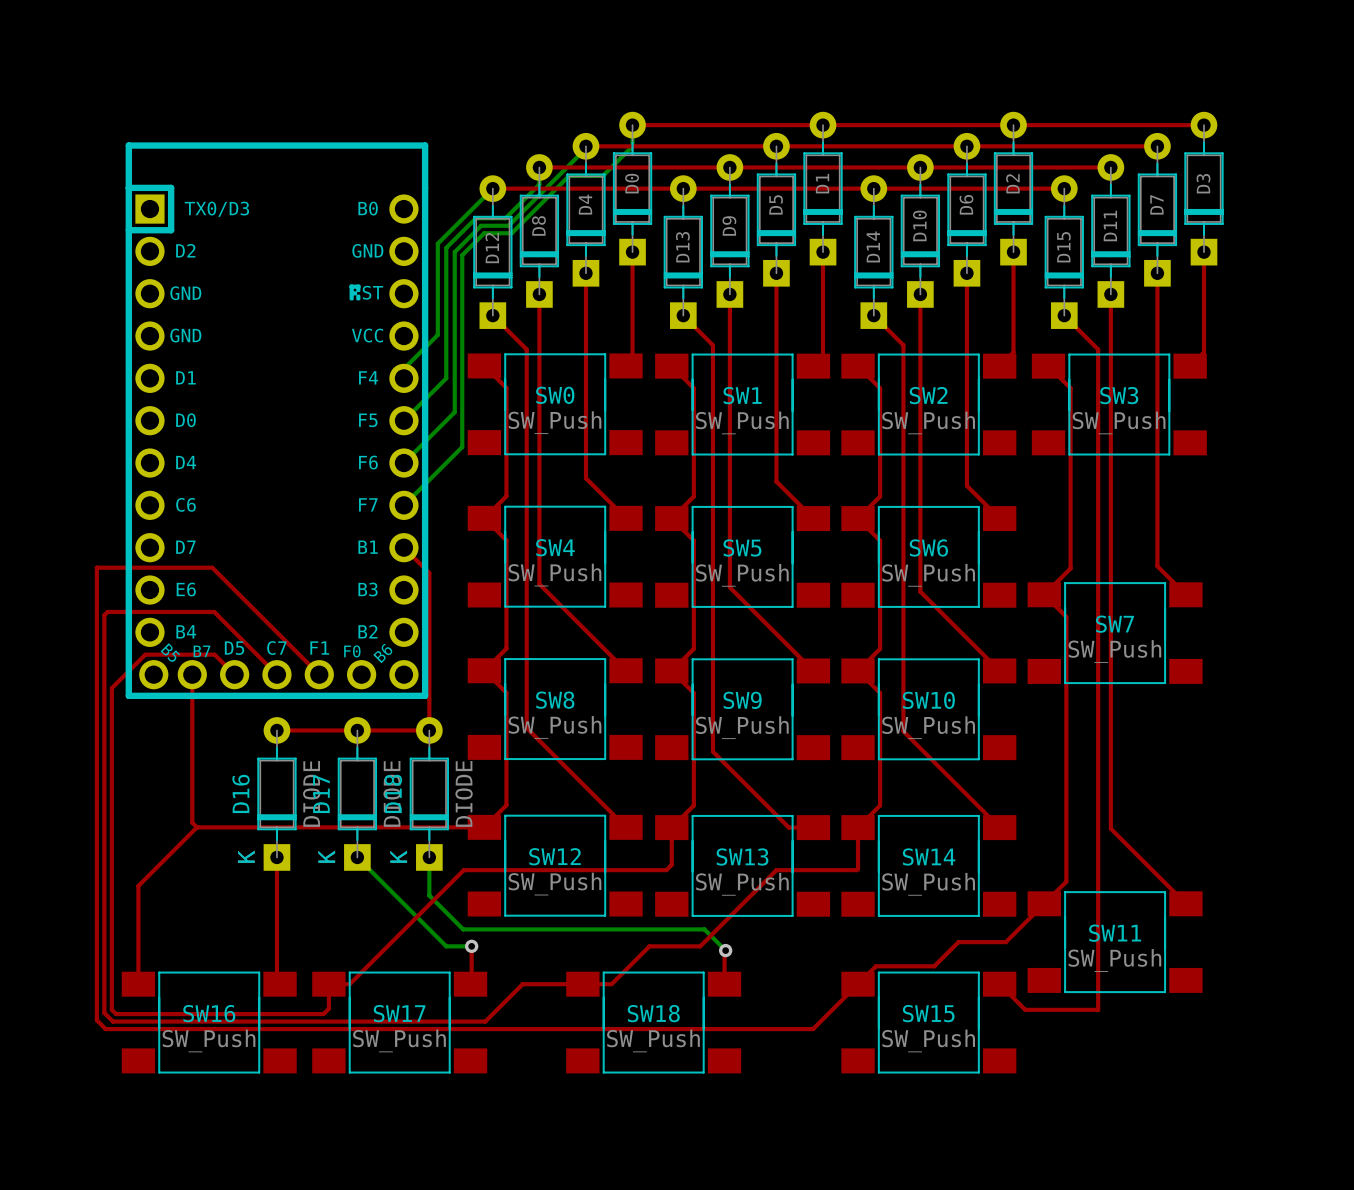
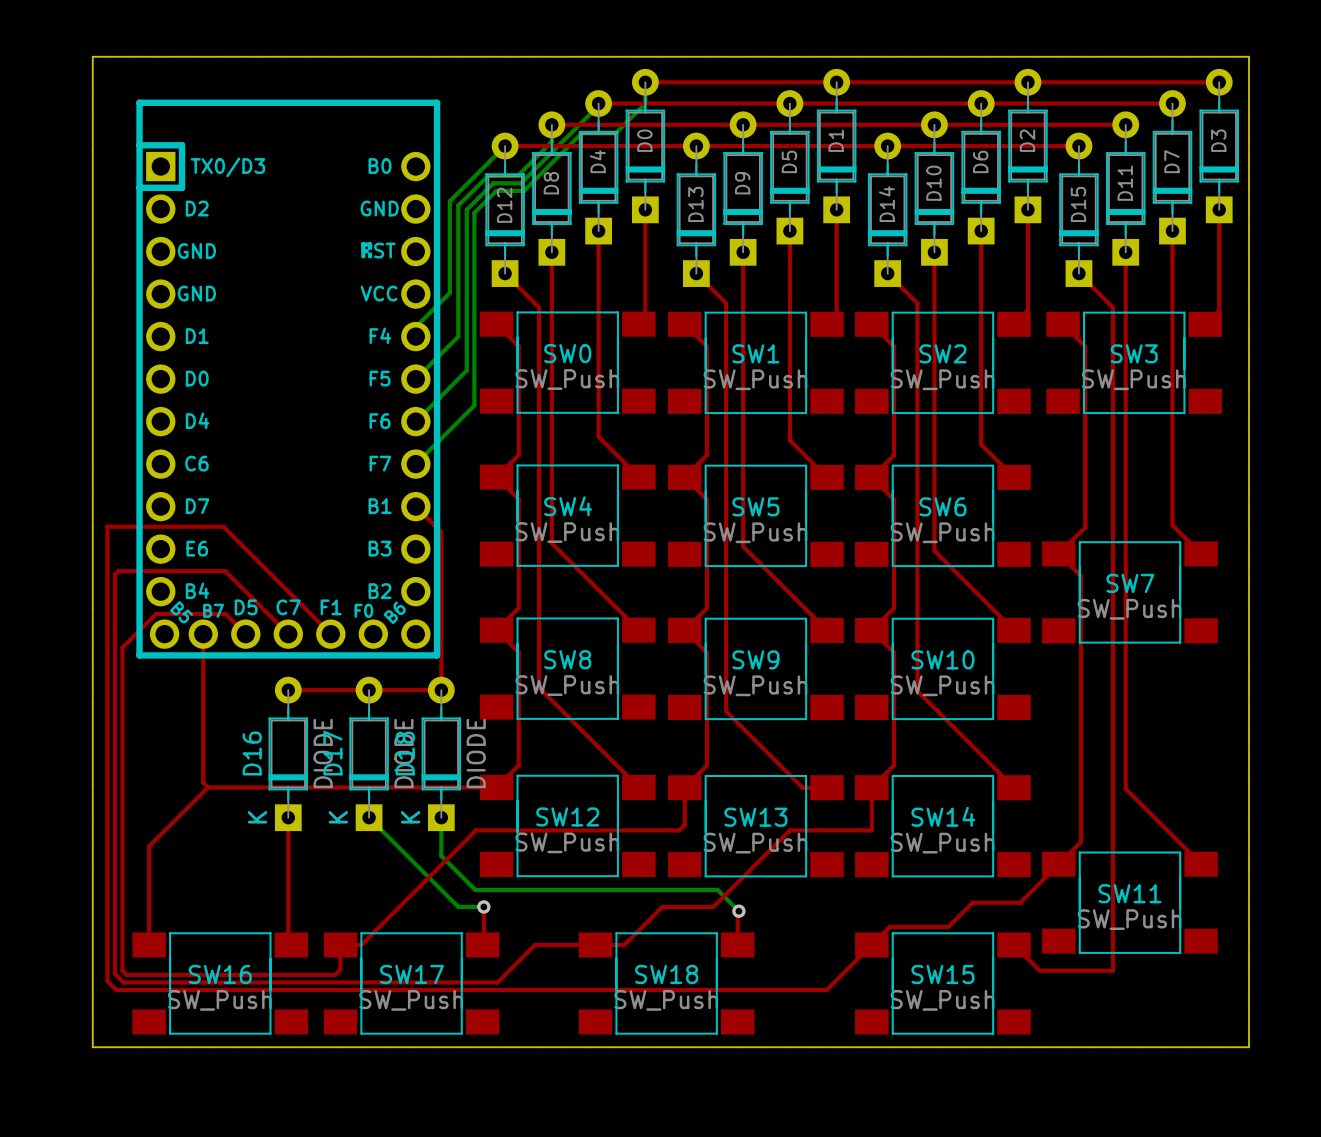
board edge: none -> (92, 56) (92, 1047) (1249, 1047) (1249, 56) (92, 56)

